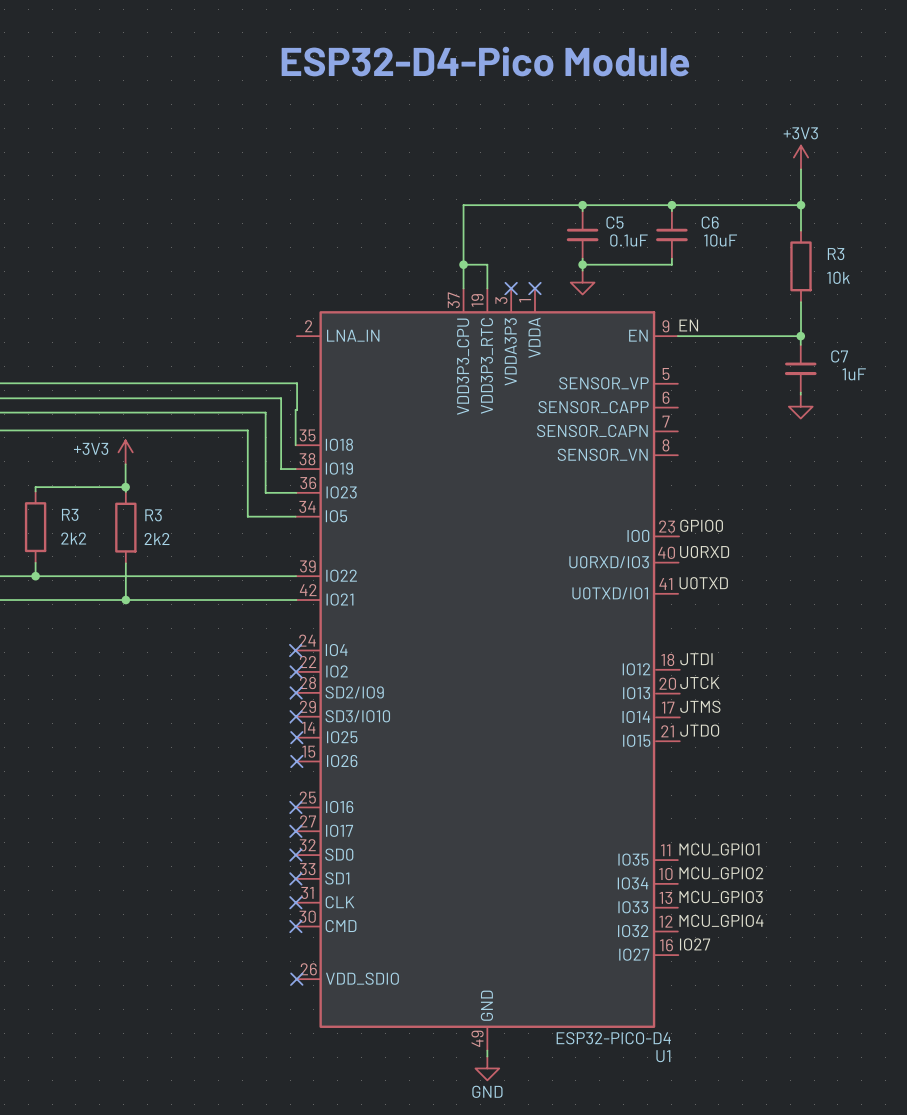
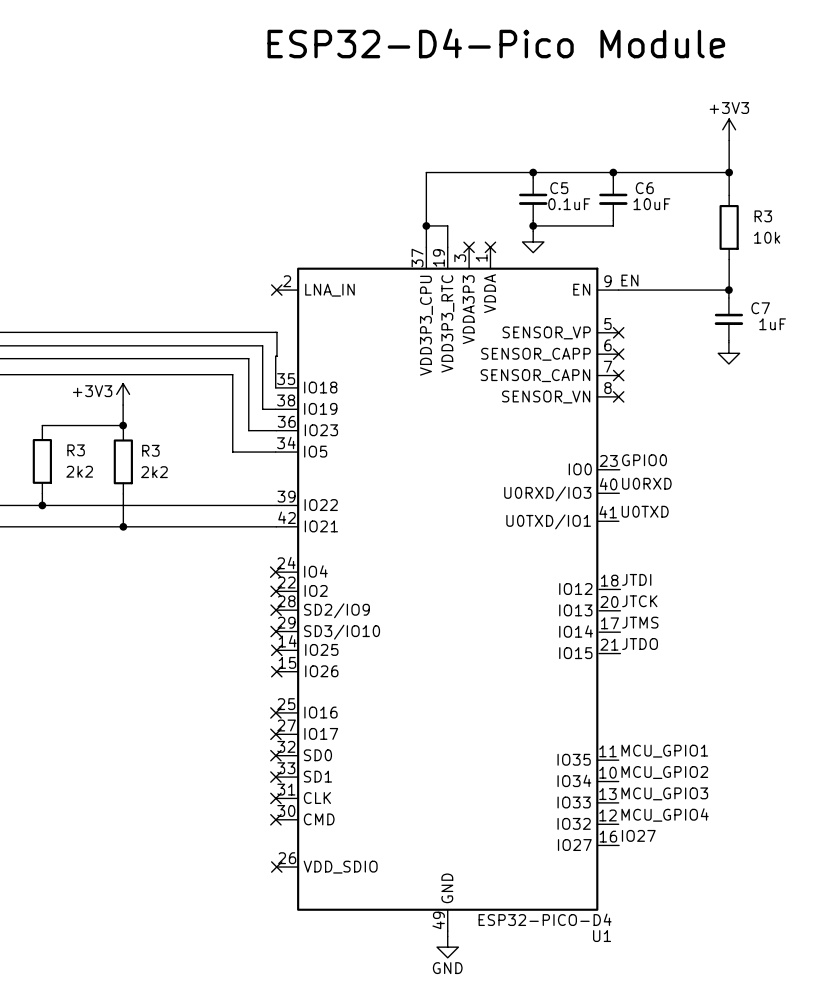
no-connect mark: none -> (276, 290)
no-connect mark: none -> (618, 332)
no-connect mark: none -> (618, 354)
no-connect mark: none -> (618, 375)
no-connect mark: none -> (618, 396)

